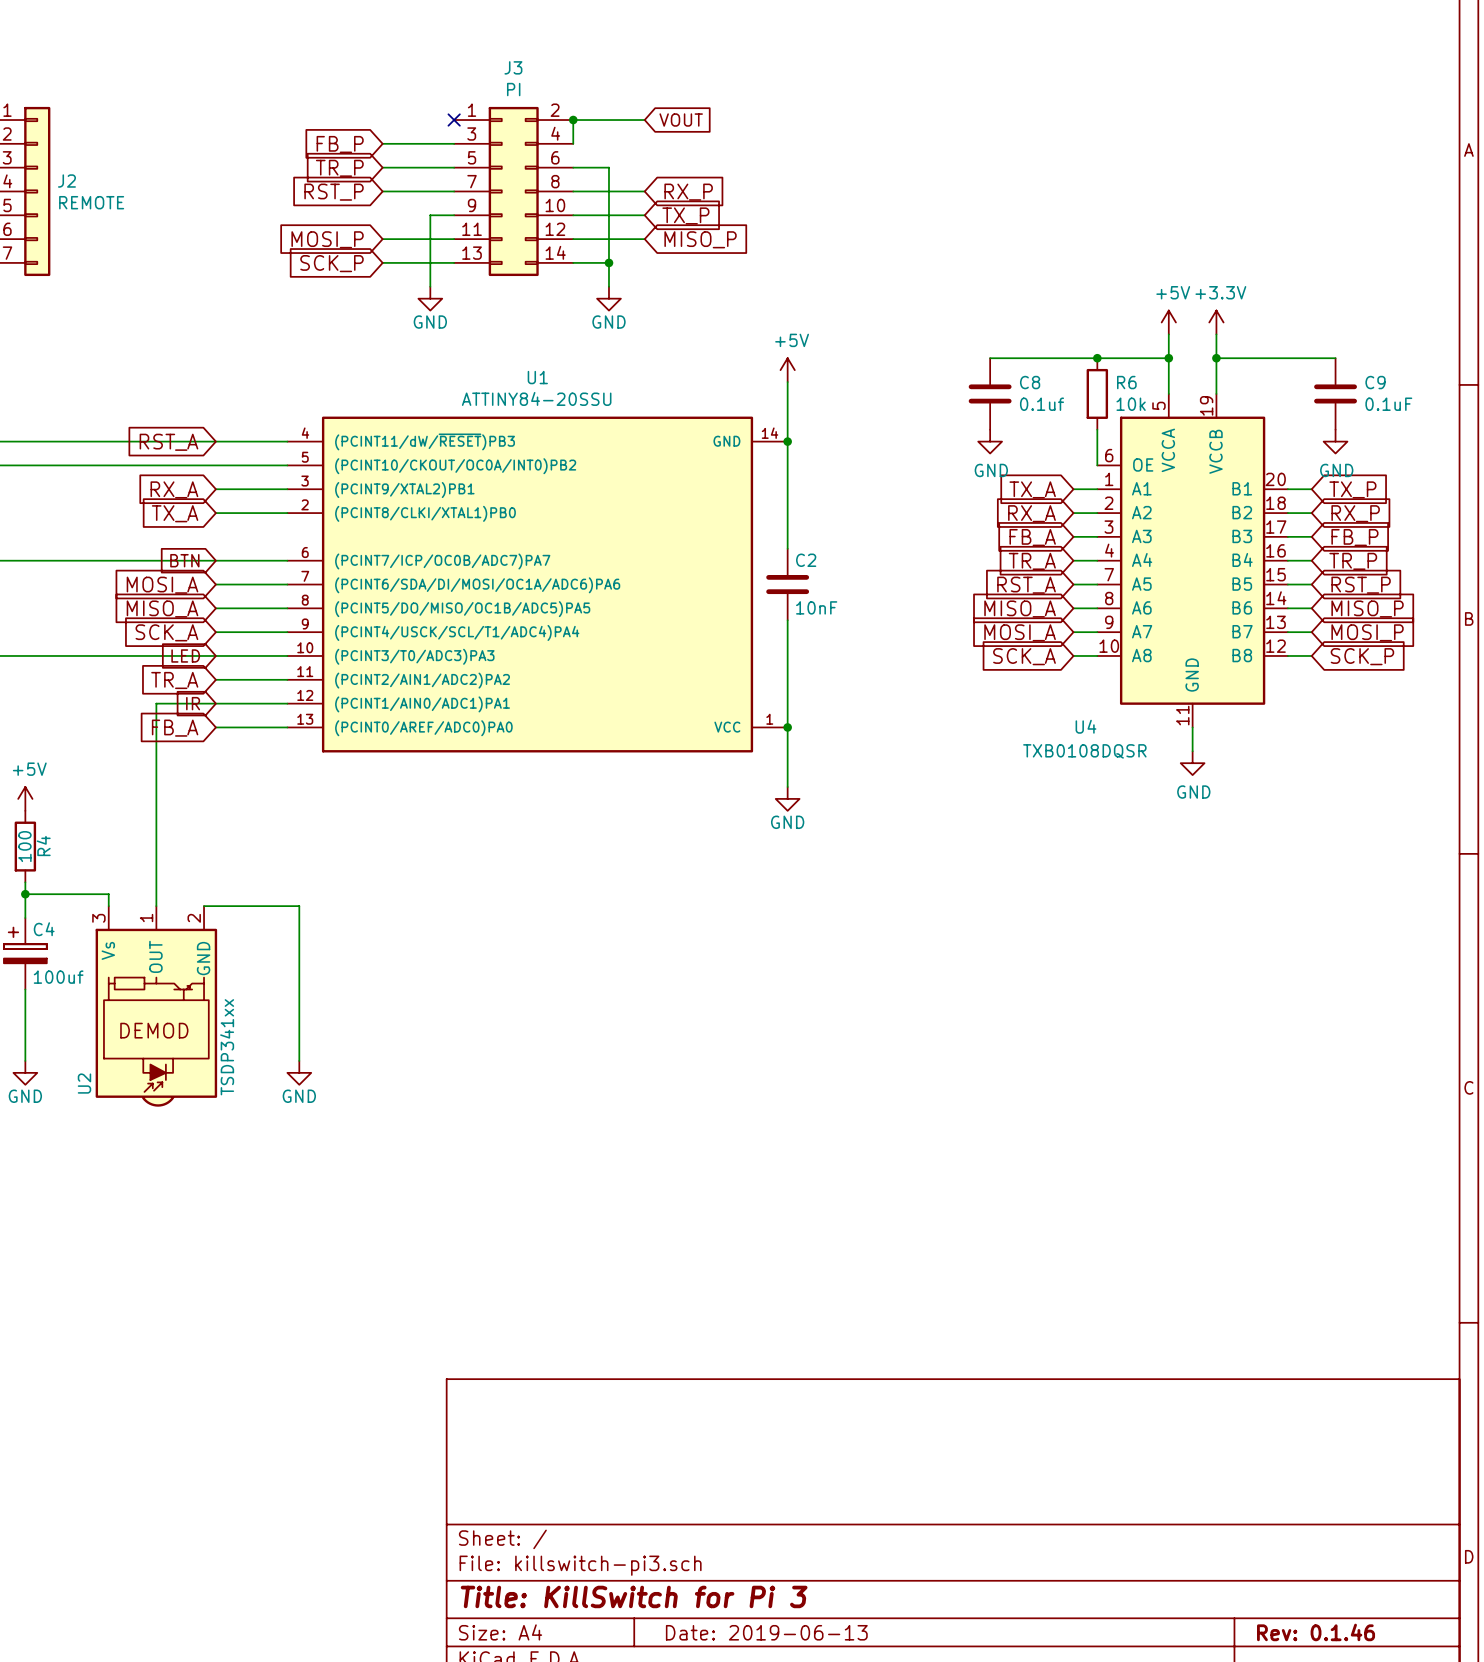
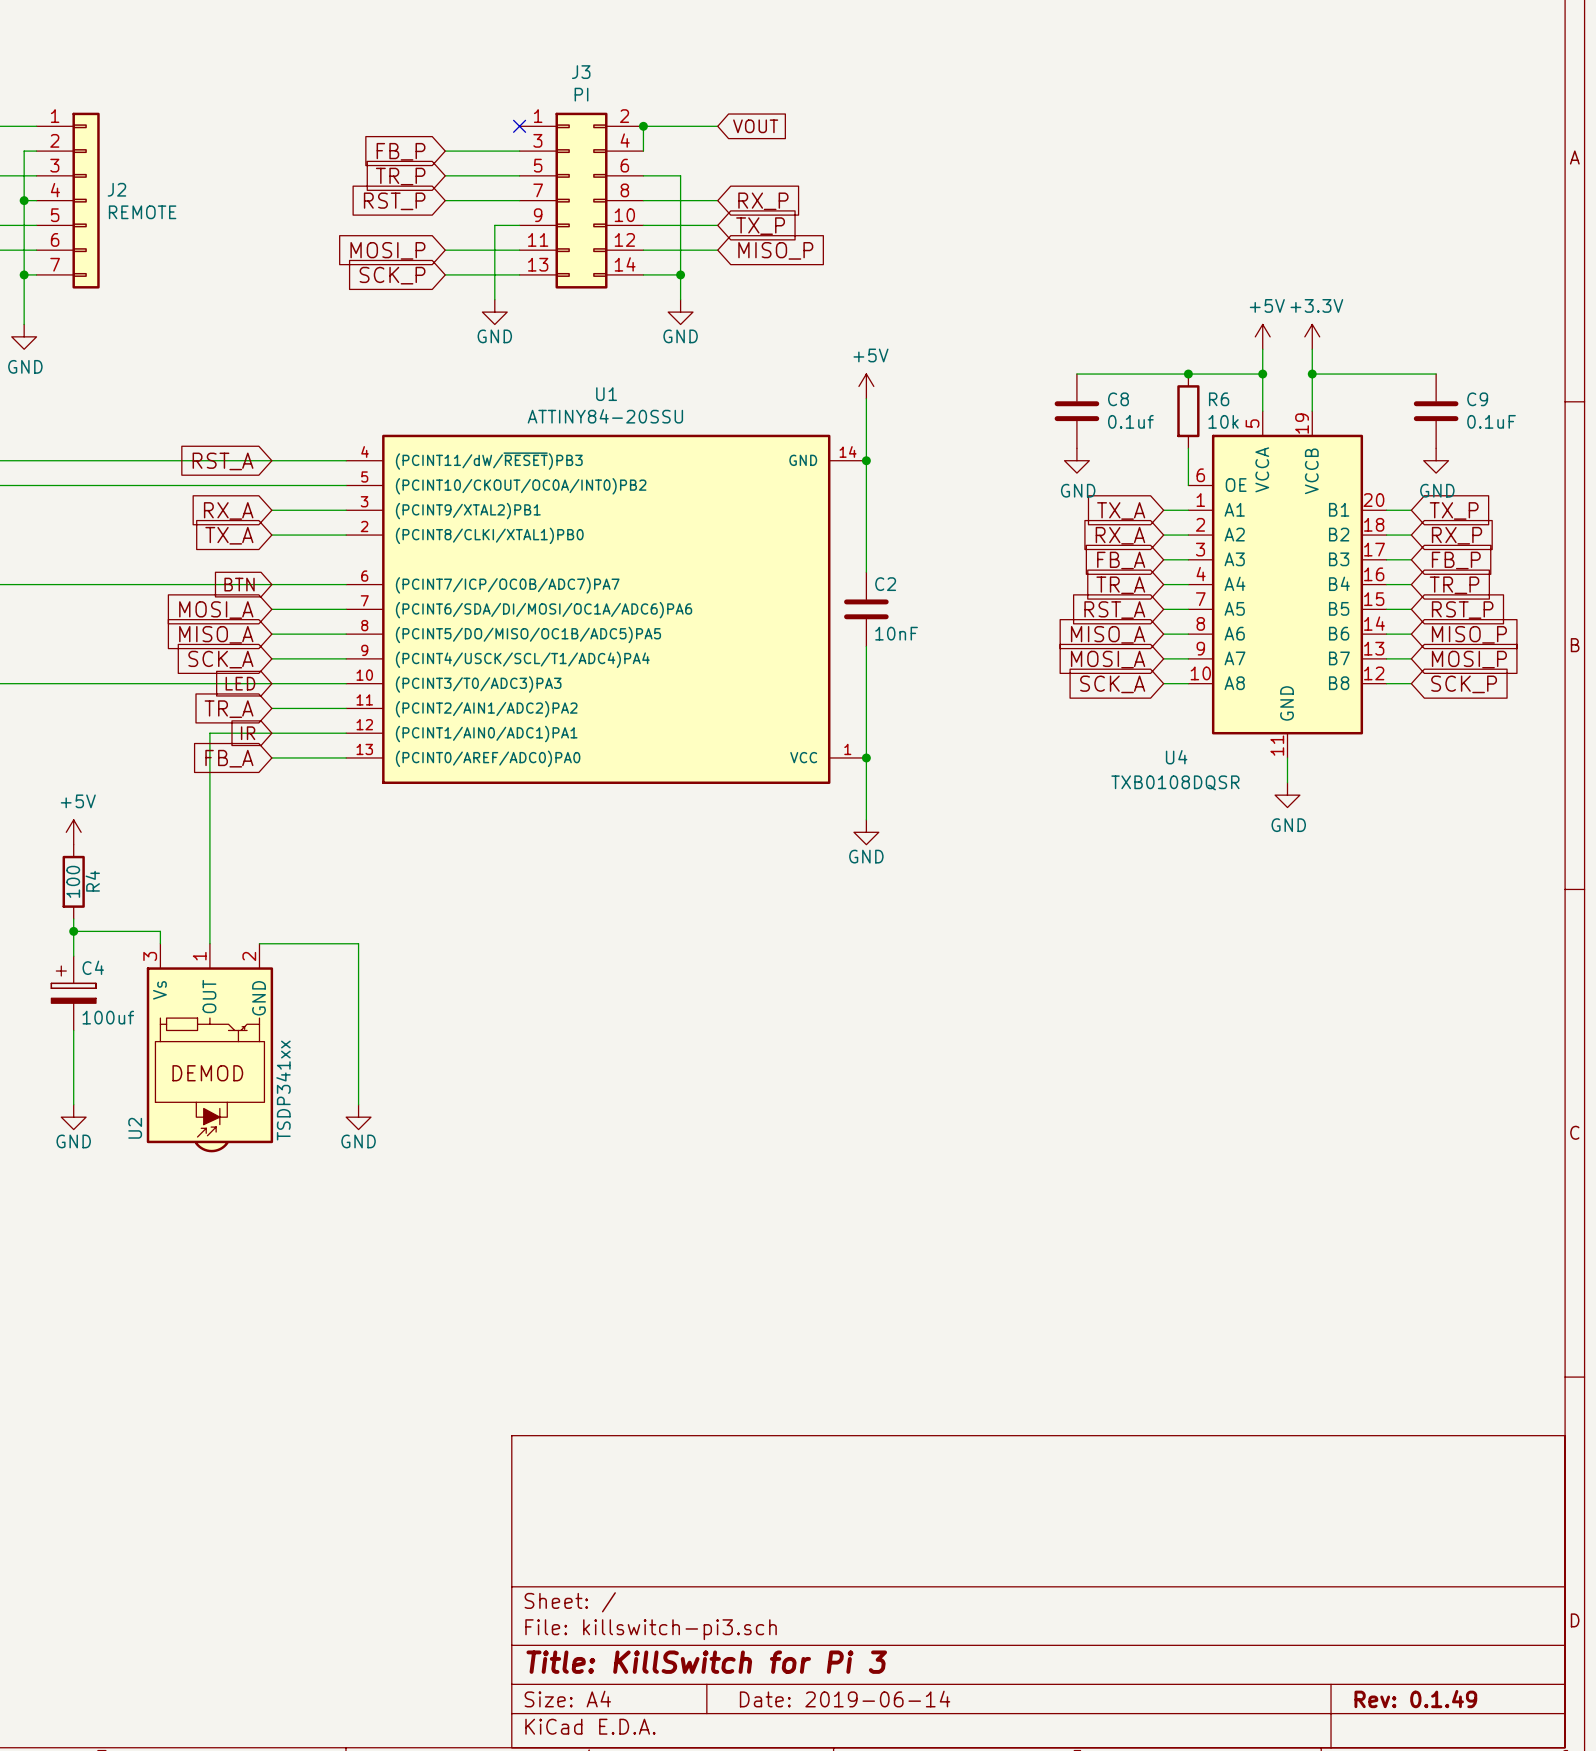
title block: Date: 2019-06-13 (766, 1632) -> Date: 2019-06-14 (845, 1699)
title block: Rev: 0.1.46 (1316, 1632) -> Rev: 0.1.49 (1415, 1699)

